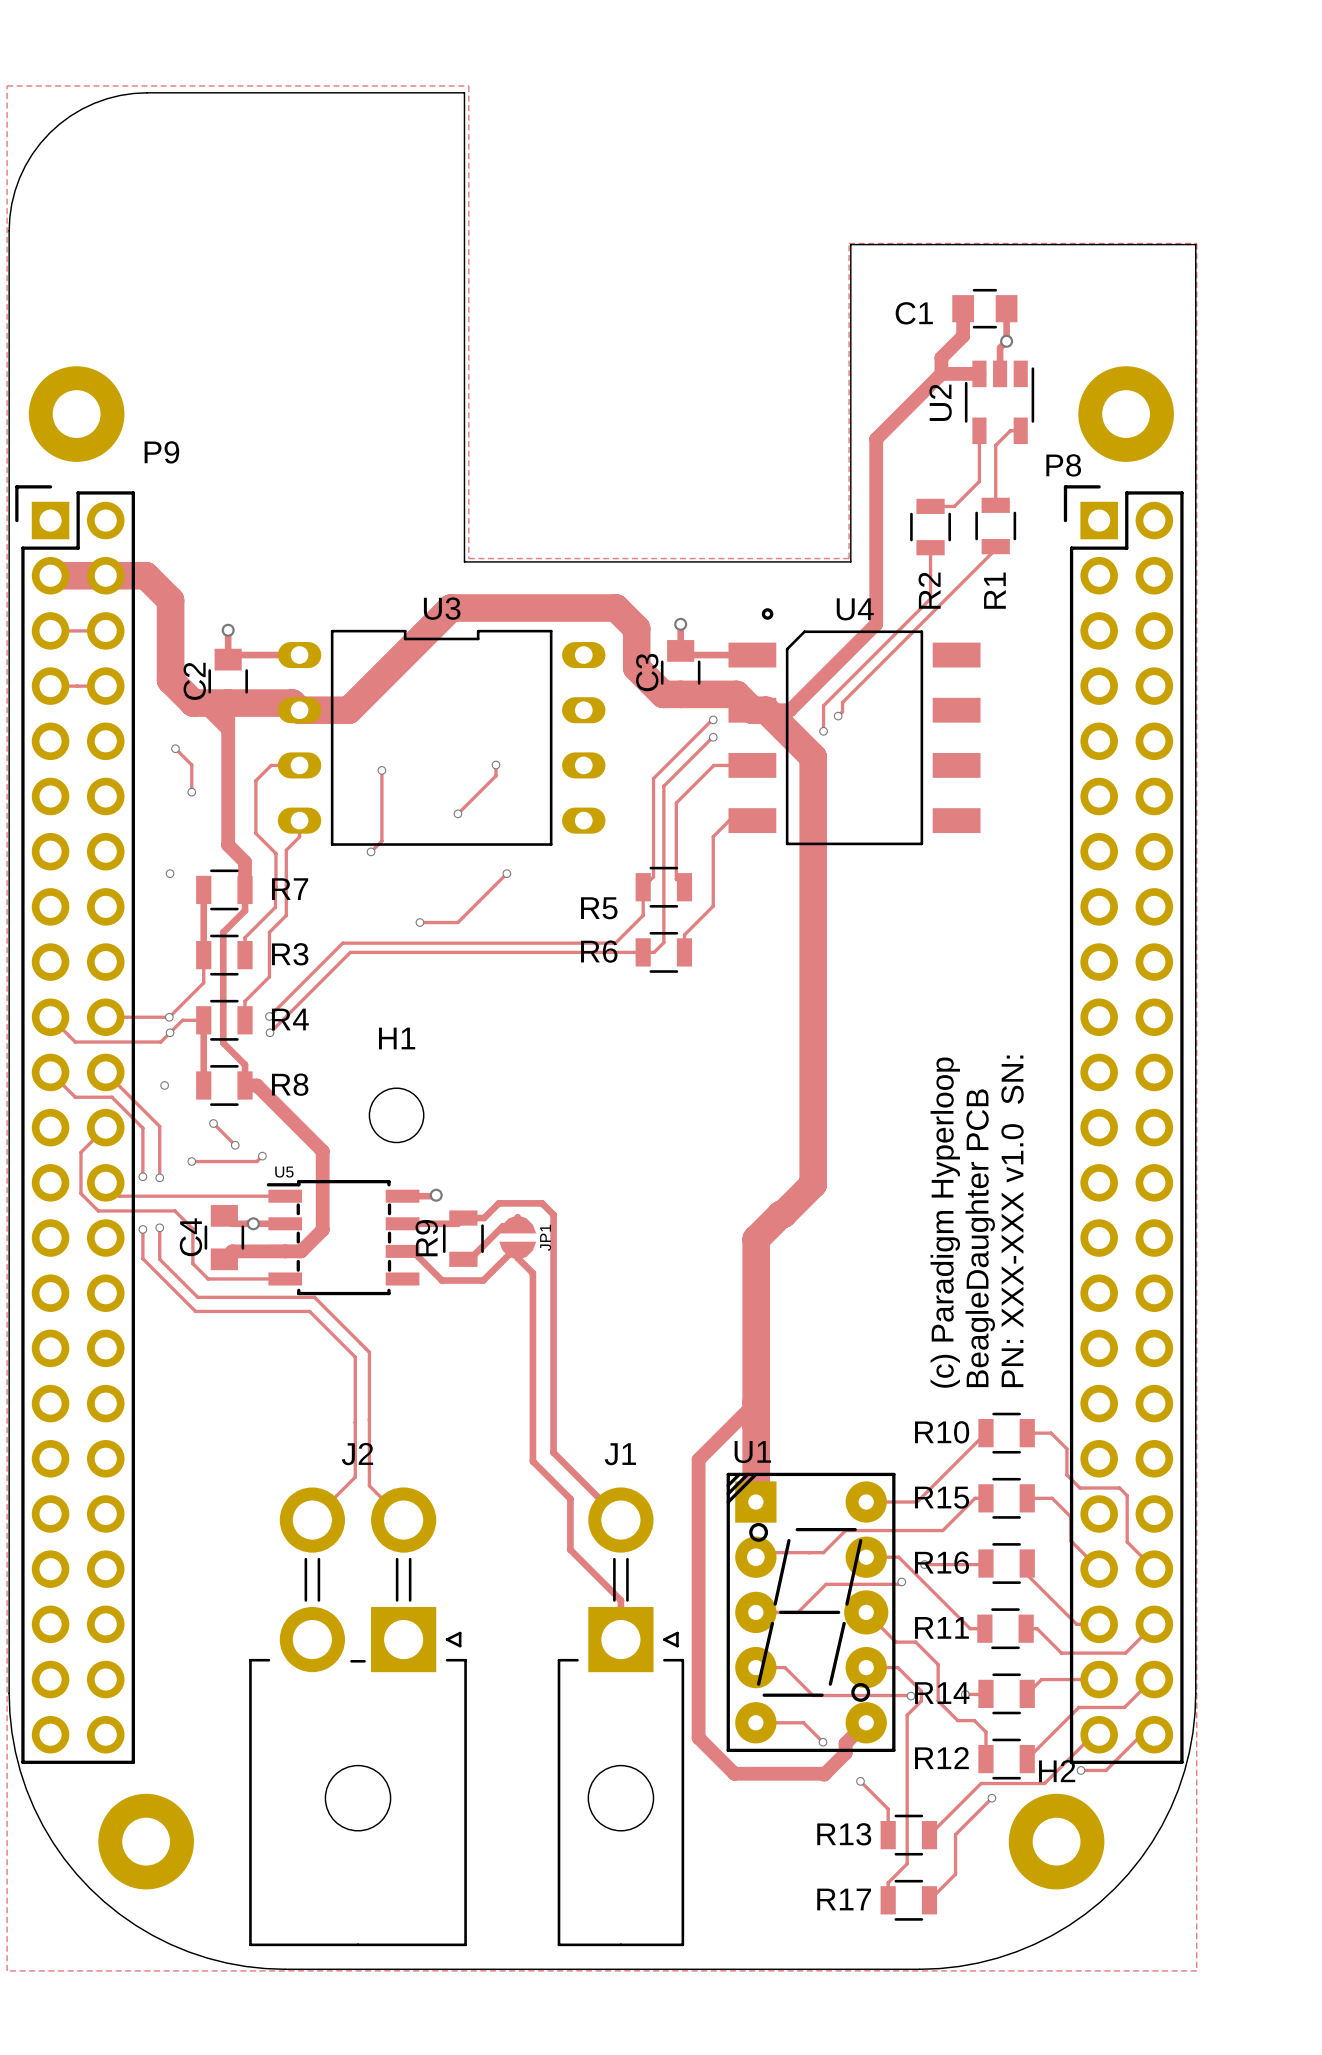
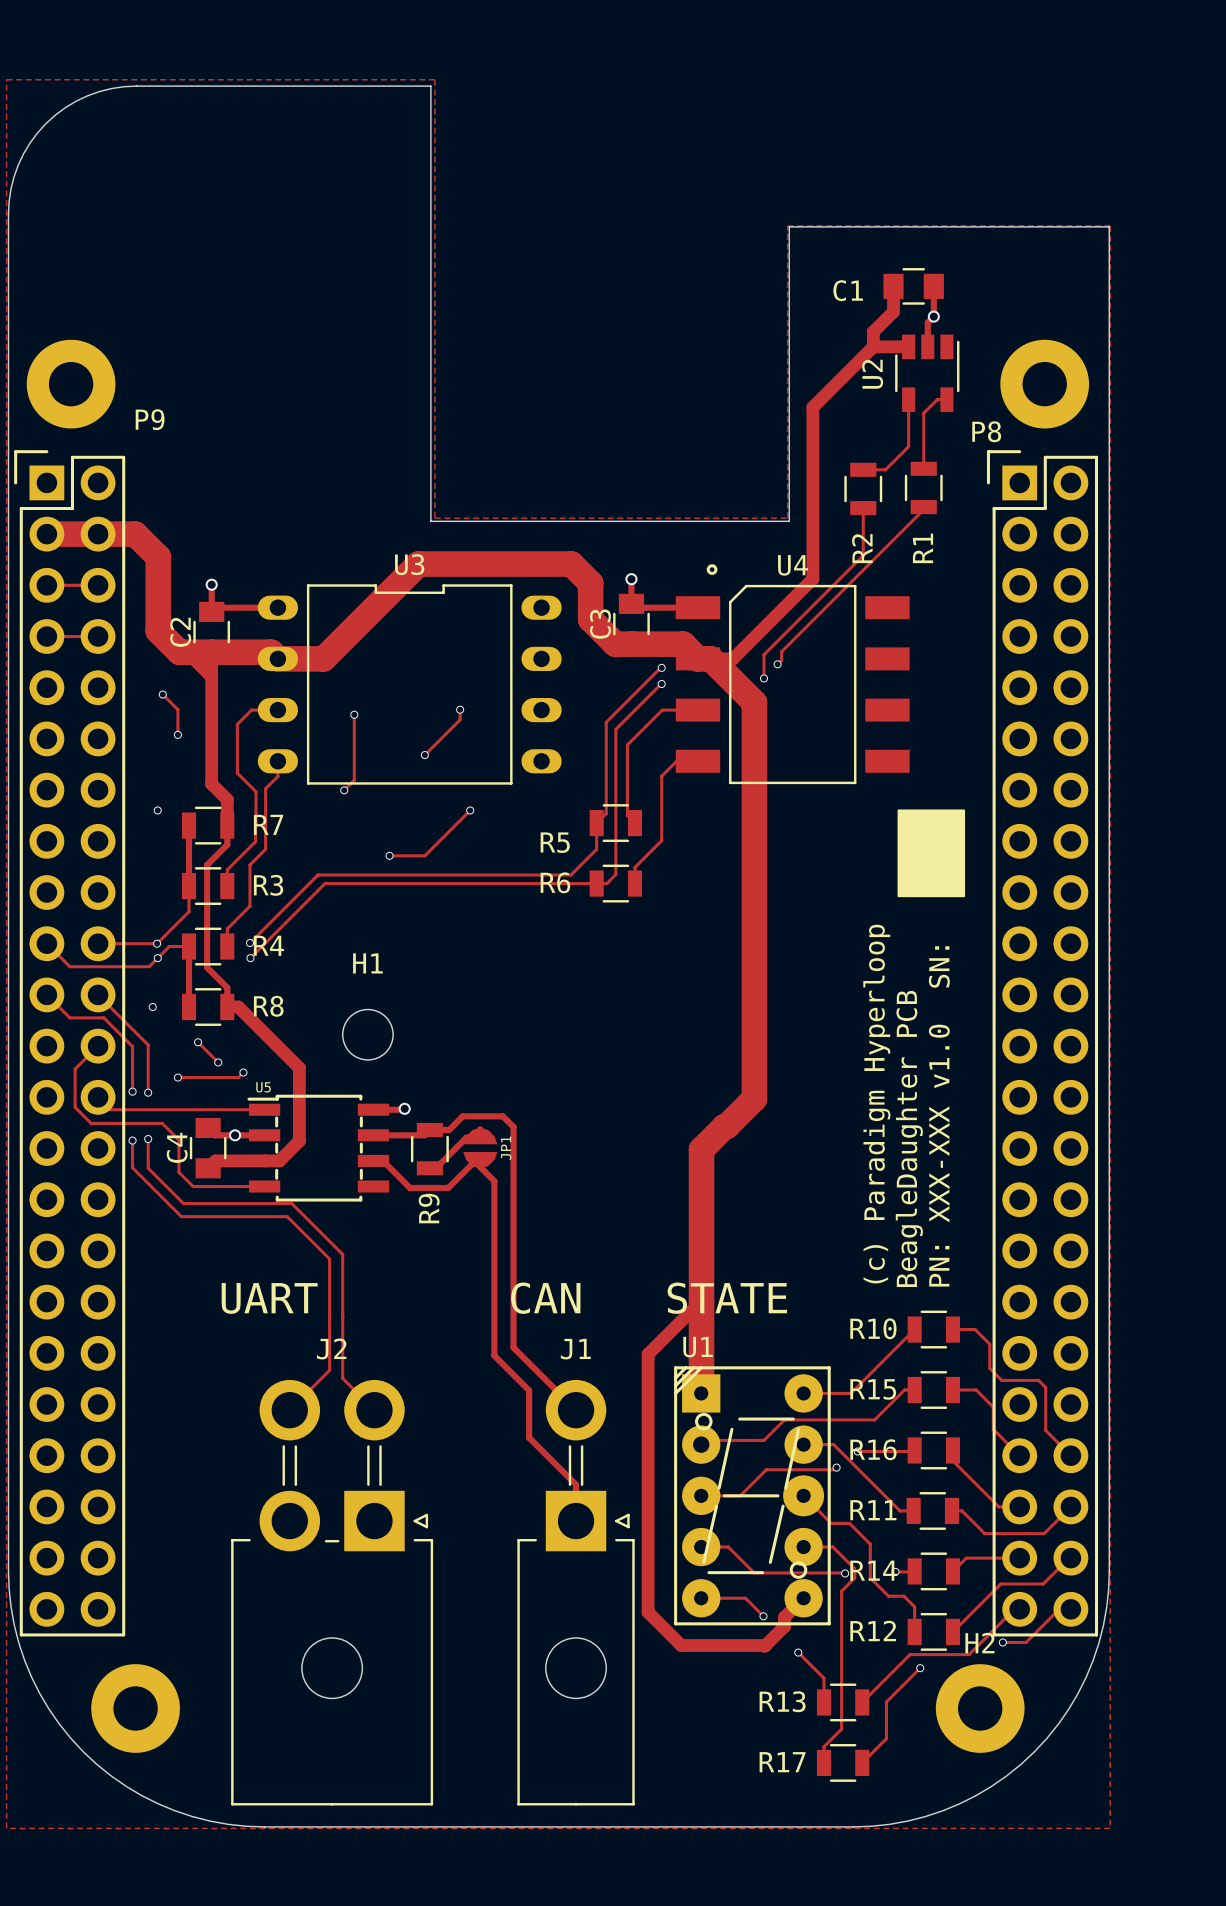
drawing: none -> [897, 809, 966, 898]
R9 name position: R9 (426, 1238) -> R9 (429, 1208)
text: none -> UART (269, 1298)
text: none -> CAN (545, 1298)
text: none -> STATE (727, 1298)

